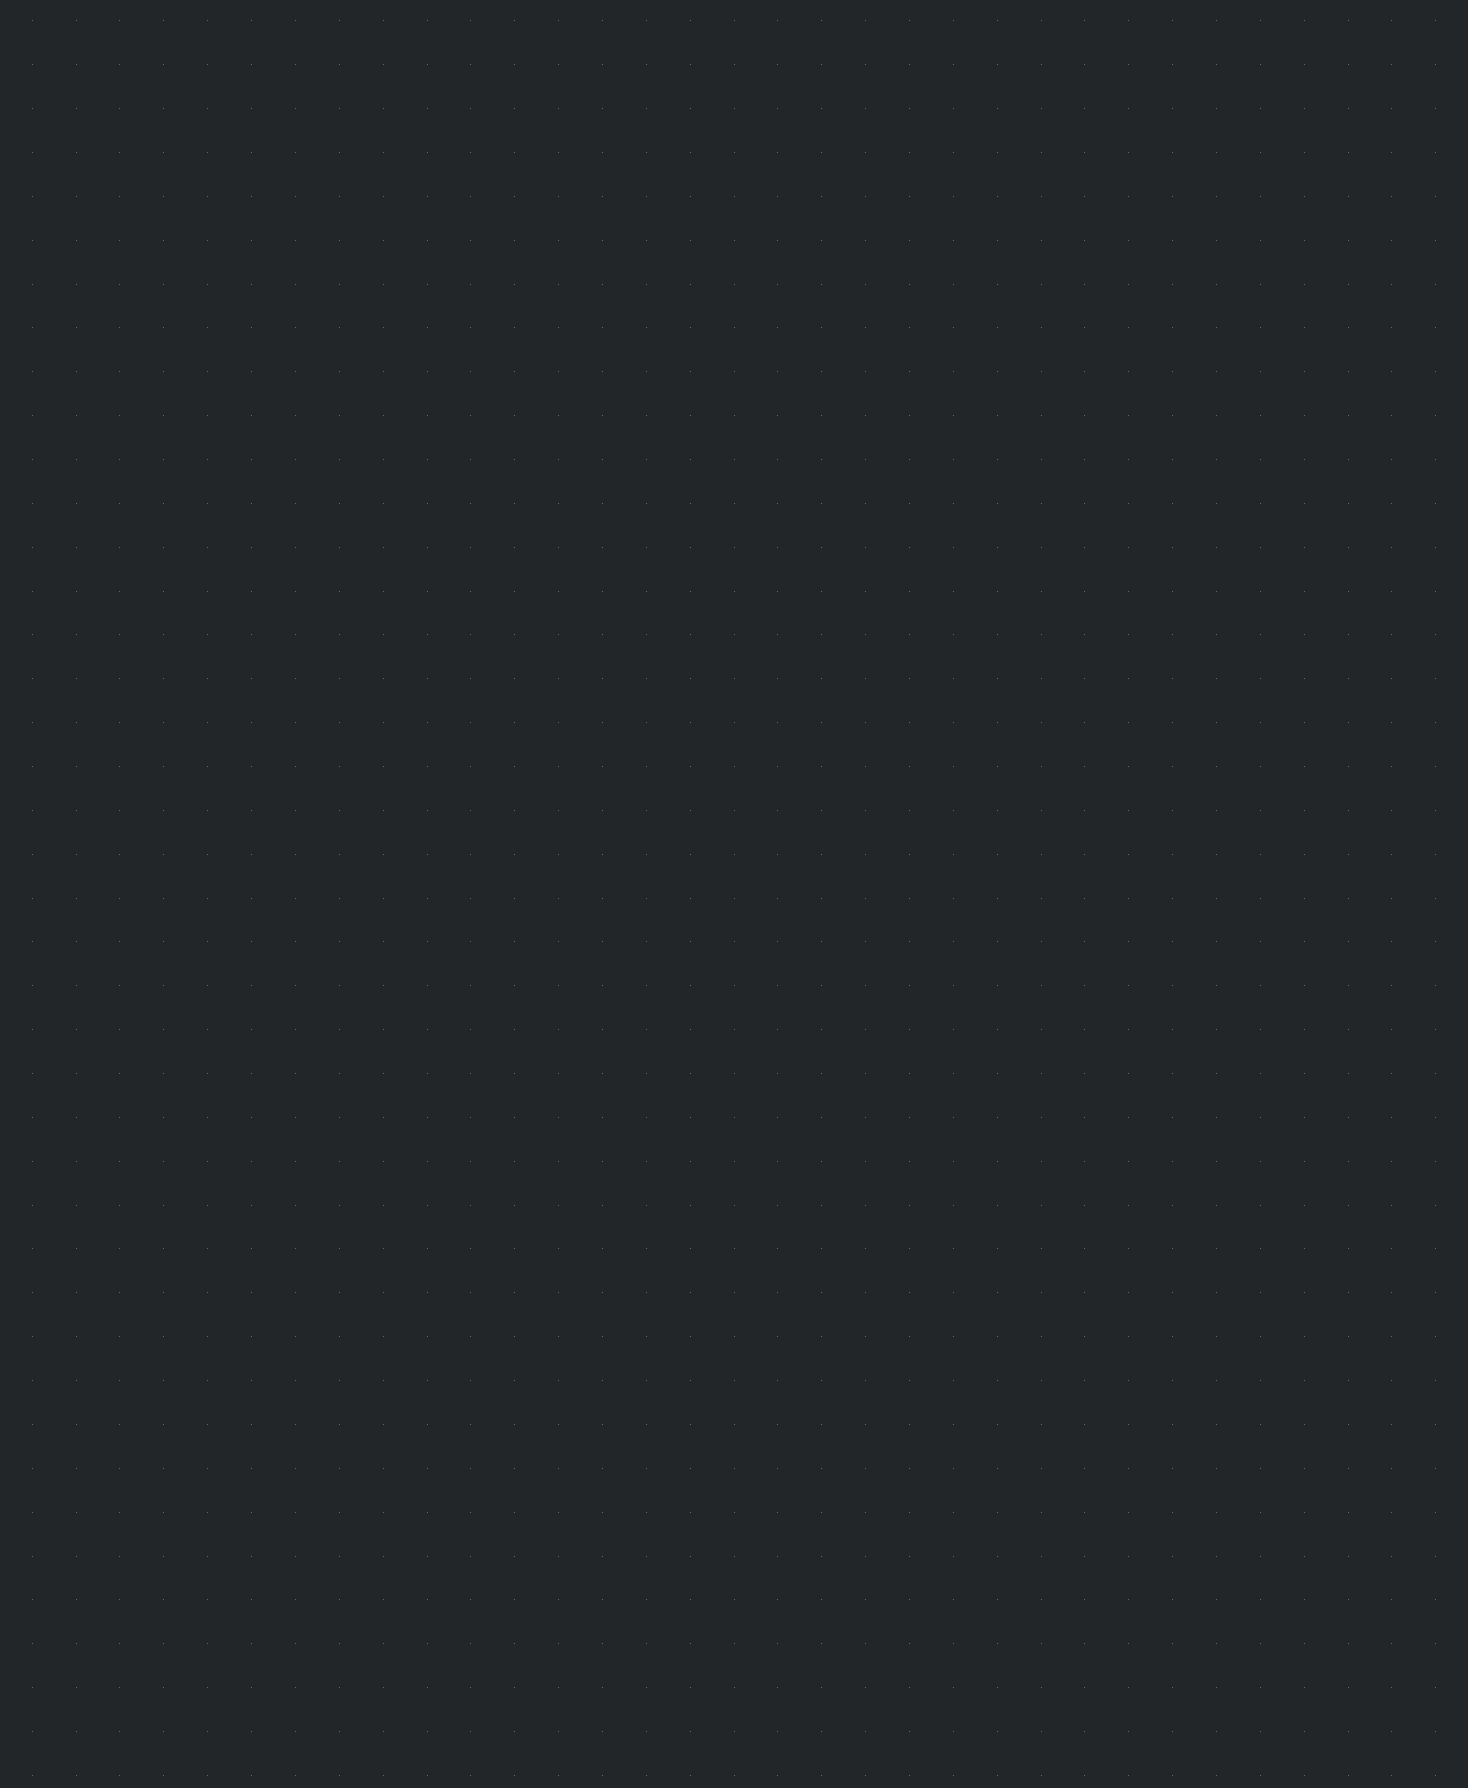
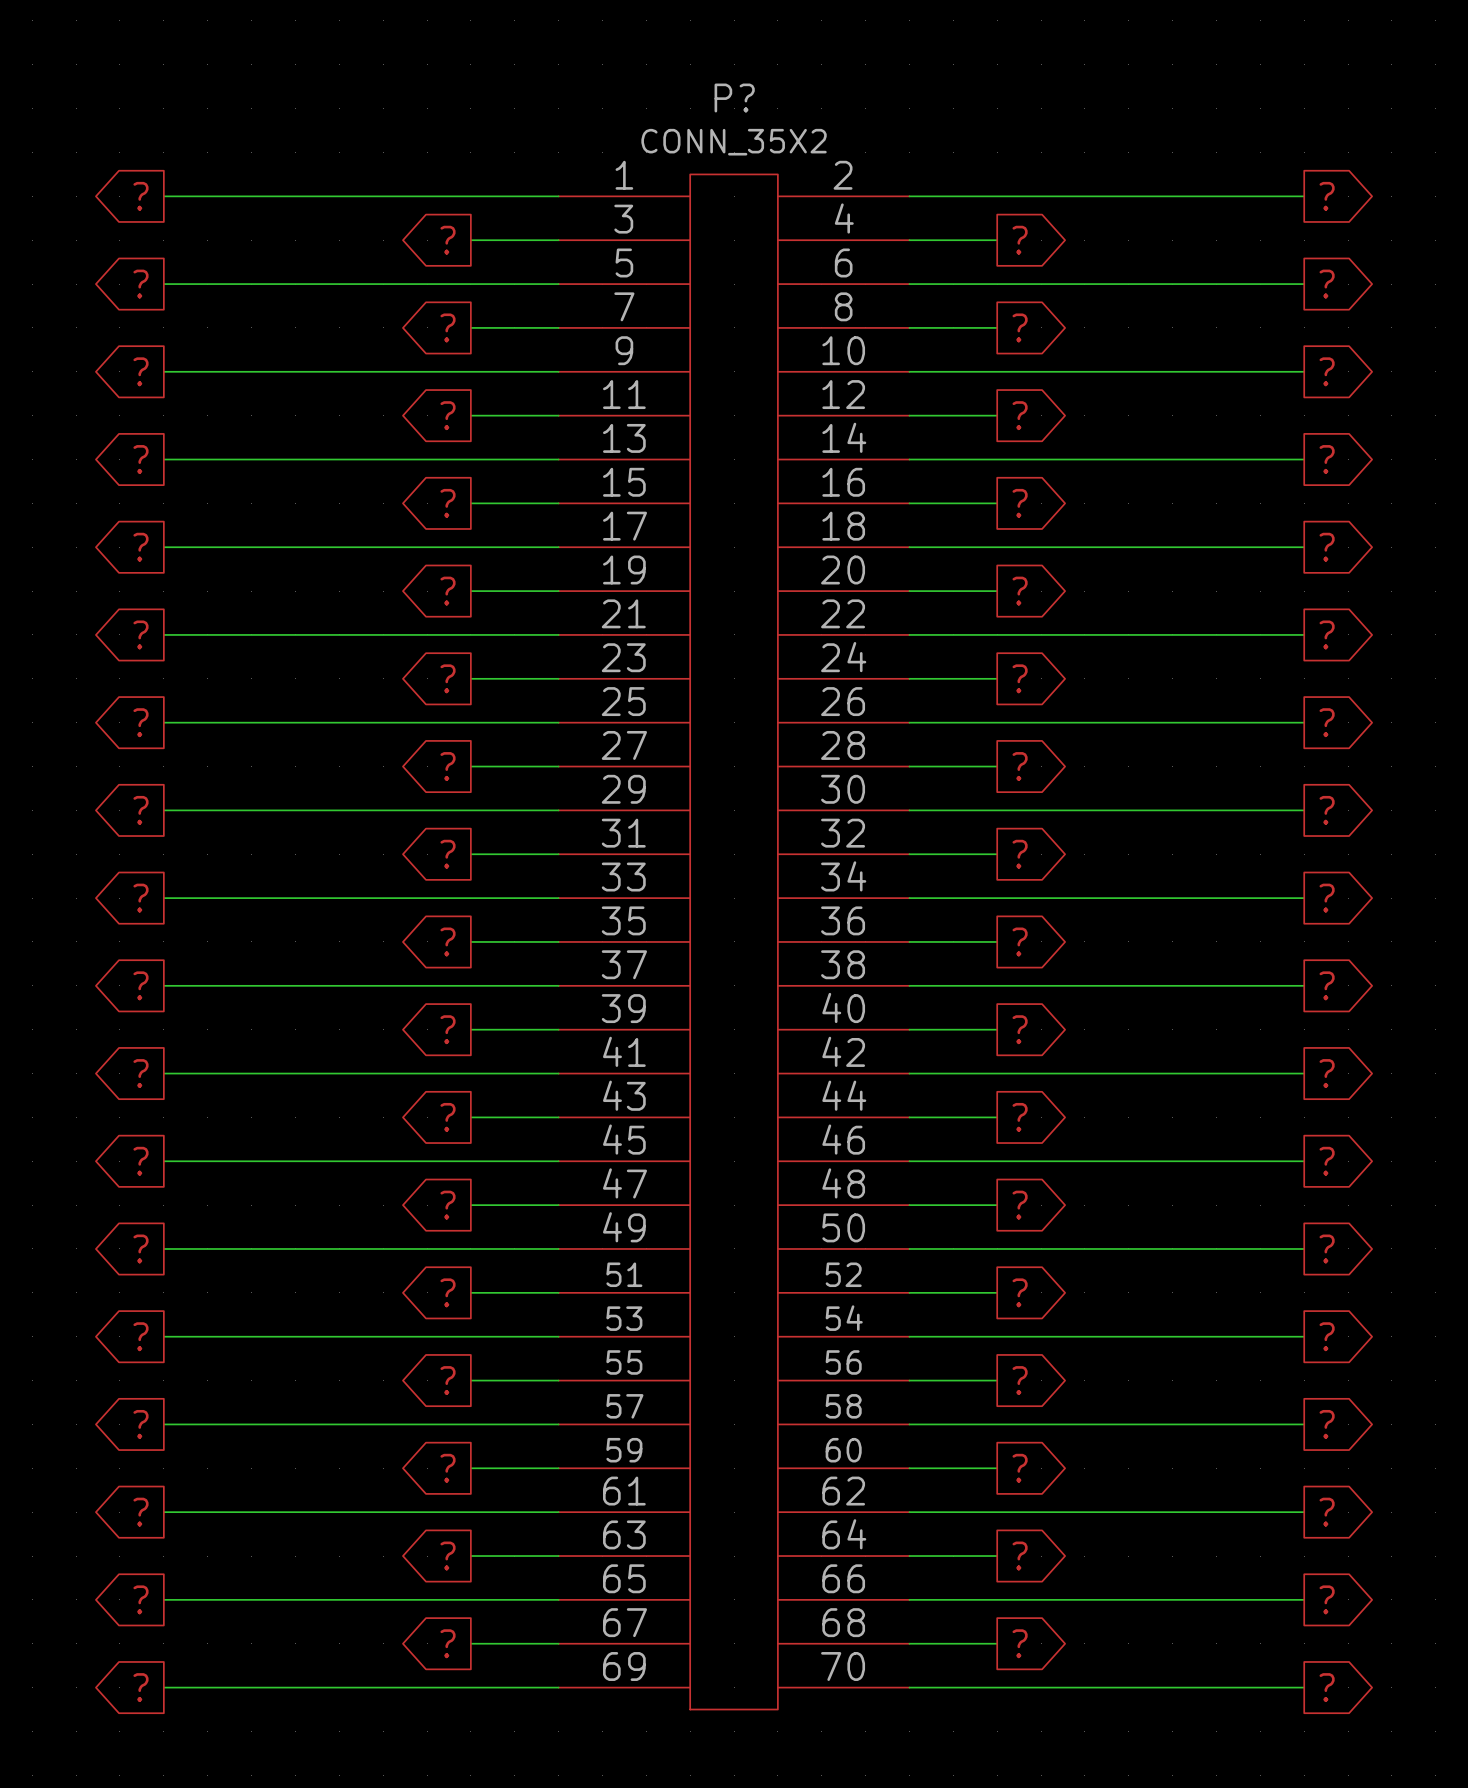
global label: none -> ? (140, 196)
wire: none -> (163, 196) (558, 196)
wire: none -> (909, 196) (1304, 196)
global label: none -> ? (1327, 196)
global label: none -> ? (447, 240)
wire: none -> (470, 240) (558, 240)
wire: none -> (909, 240) (997, 240)
global label: none -> ? (1020, 240)
global label: none -> ? (140, 284)
wire: none -> (163, 284) (558, 284)
wire: none -> (909, 284) (1304, 284)
global label: none -> ? (1327, 284)
global label: none -> ? (447, 327)
wire: none -> (470, 327) (558, 327)
wire: none -> (909, 327) (997, 327)
global label: none -> ? (1020, 327)
global label: none -> ? (140, 371)
wire: none -> (163, 371) (558, 371)
wire: none -> (909, 371) (1304, 371)
global label: none -> ? (1327, 371)
global label: none -> ? (447, 415)
wire: none -> (470, 415) (558, 415)
wire: none -> (909, 415) (997, 415)
global label: none -> ? (1020, 415)
global label: none -> ? (140, 459)
wire: none -> (163, 459) (558, 459)
wire: none -> (909, 459) (1304, 459)
global label: none -> ? (1327, 459)
global label: none -> ? (447, 503)
wire: none -> (470, 503) (558, 503)
wire: none -> (909, 503) (997, 503)
global label: none -> ? (1020, 503)
global label: none -> ? (140, 547)
wire: none -> (163, 547) (558, 547)
wire: none -> (909, 547) (1304, 547)
global label: none -> ? (1327, 547)
global label: none -> ? (447, 591)
wire: none -> (470, 591) (558, 591)
wire: none -> (909, 591) (997, 591)
global label: none -> ? (1020, 591)
global label: none -> ? (140, 634)
wire: none -> (163, 634) (558, 634)
wire: none -> (909, 634) (1304, 634)
global label: none -> ? (1327, 634)
global label: none -> ? (447, 678)
wire: none -> (470, 678) (558, 678)
wire: none -> (909, 678) (997, 678)
global label: none -> ? (1020, 678)
global label: none -> ? (140, 722)
wire: none -> (163, 722) (558, 722)
wire: none -> (909, 722) (1304, 722)
global label: none -> ? (1327, 722)
global label: none -> ? (447, 766)
wire: none -> (470, 766) (558, 766)
wire: none -> (909, 766) (997, 766)
global label: none -> ? (1020, 766)
global label: none -> ? (140, 810)
wire: none -> (163, 810) (558, 810)
wire: none -> (909, 810) (1304, 810)
global label: none -> ? (1327, 810)
global label: none -> ? (447, 854)
wire: none -> (470, 854) (558, 854)
wire: none -> (909, 854) (997, 854)
global label: none -> ? (1020, 854)
global label: none -> ? (140, 898)
wire: none -> (163, 898) (558, 898)
wire: none -> (909, 898) (1304, 898)
global label: none -> ? (1327, 898)
global label: none -> ? (447, 941)
wire: none -> (470, 941) (558, 941)
P?: none -> CONN_35X2 (734, 941)
wire: none -> (909, 941) (997, 941)
global label: none -> ? (1020, 941)
global label: none -> ? (140, 985)
wire: none -> (163, 985) (558, 985)
wire: none -> (909, 985) (1304, 985)
global label: none -> ? (1327, 985)
global label: none -> ? (447, 1029)
wire: none -> (470, 1029) (558, 1029)
wire: none -> (909, 1029) (997, 1029)
global label: none -> ? (1020, 1029)
global label: none -> ? (140, 1073)
wire: none -> (163, 1073) (558, 1073)
wire: none -> (909, 1073) (1304, 1073)
global label: none -> ? (1327, 1073)
global label: none -> ? (447, 1117)
wire: none -> (470, 1117) (558, 1117)
wire: none -> (909, 1117) (997, 1117)
global label: none -> ? (1020, 1117)
global label: none -> ? (140, 1161)
wire: none -> (163, 1161) (558, 1161)
wire: none -> (909, 1161) (1304, 1161)
global label: none -> ? (1327, 1161)
global label: none -> ? (447, 1205)
wire: none -> (470, 1205) (558, 1205)
wire: none -> (909, 1205) (997, 1205)
global label: none -> ? (1020, 1205)
global label: none -> ? (140, 1248)
wire: none -> (163, 1248) (558, 1248)
wire: none -> (909, 1248) (1304, 1248)
global label: none -> ? (1327, 1248)
global label: none -> ? (447, 1292)
wire: none -> (470, 1292) (558, 1292)
wire: none -> (909, 1292) (997, 1292)
global label: none -> ? (1020, 1292)
global label: none -> ? (140, 1336)
wire: none -> (163, 1336) (558, 1336)
wire: none -> (909, 1336) (1304, 1336)
global label: none -> ? (1327, 1336)
global label: none -> ? (447, 1380)
wire: none -> (470, 1380) (558, 1380)
wire: none -> (909, 1380) (997, 1380)
global label: none -> ? (1020, 1380)
global label: none -> ? (140, 1424)
wire: none -> (163, 1424) (558, 1424)
wire: none -> (909, 1424) (1304, 1424)
global label: none -> ? (1327, 1424)
global label: none -> ? (447, 1468)
wire: none -> (470, 1468) (558, 1468)
wire: none -> (909, 1468) (997, 1468)
global label: none -> ? (1020, 1468)
global label: none -> ? (140, 1512)
wire: none -> (163, 1512) (558, 1512)
wire: none -> (909, 1512) (1304, 1512)
global label: none -> ? (1327, 1512)
global label: none -> ? (447, 1556)
wire: none -> (470, 1556) (558, 1556)
wire: none -> (909, 1556) (997, 1556)
global label: none -> ? (1020, 1556)
global label: none -> ? (140, 1599)
wire: none -> (163, 1599) (558, 1599)
wire: none -> (909, 1599) (1304, 1599)
global label: none -> ? (1327, 1599)
global label: none -> ? (447, 1643)
wire: none -> (470, 1643) (558, 1643)
wire: none -> (909, 1643) (997, 1643)
global label: none -> ? (1020, 1643)
global label: none -> ? (140, 1687)
wire: none -> (163, 1687) (558, 1687)
wire: none -> (909, 1687) (1304, 1687)
global label: none -> ? (1327, 1687)

